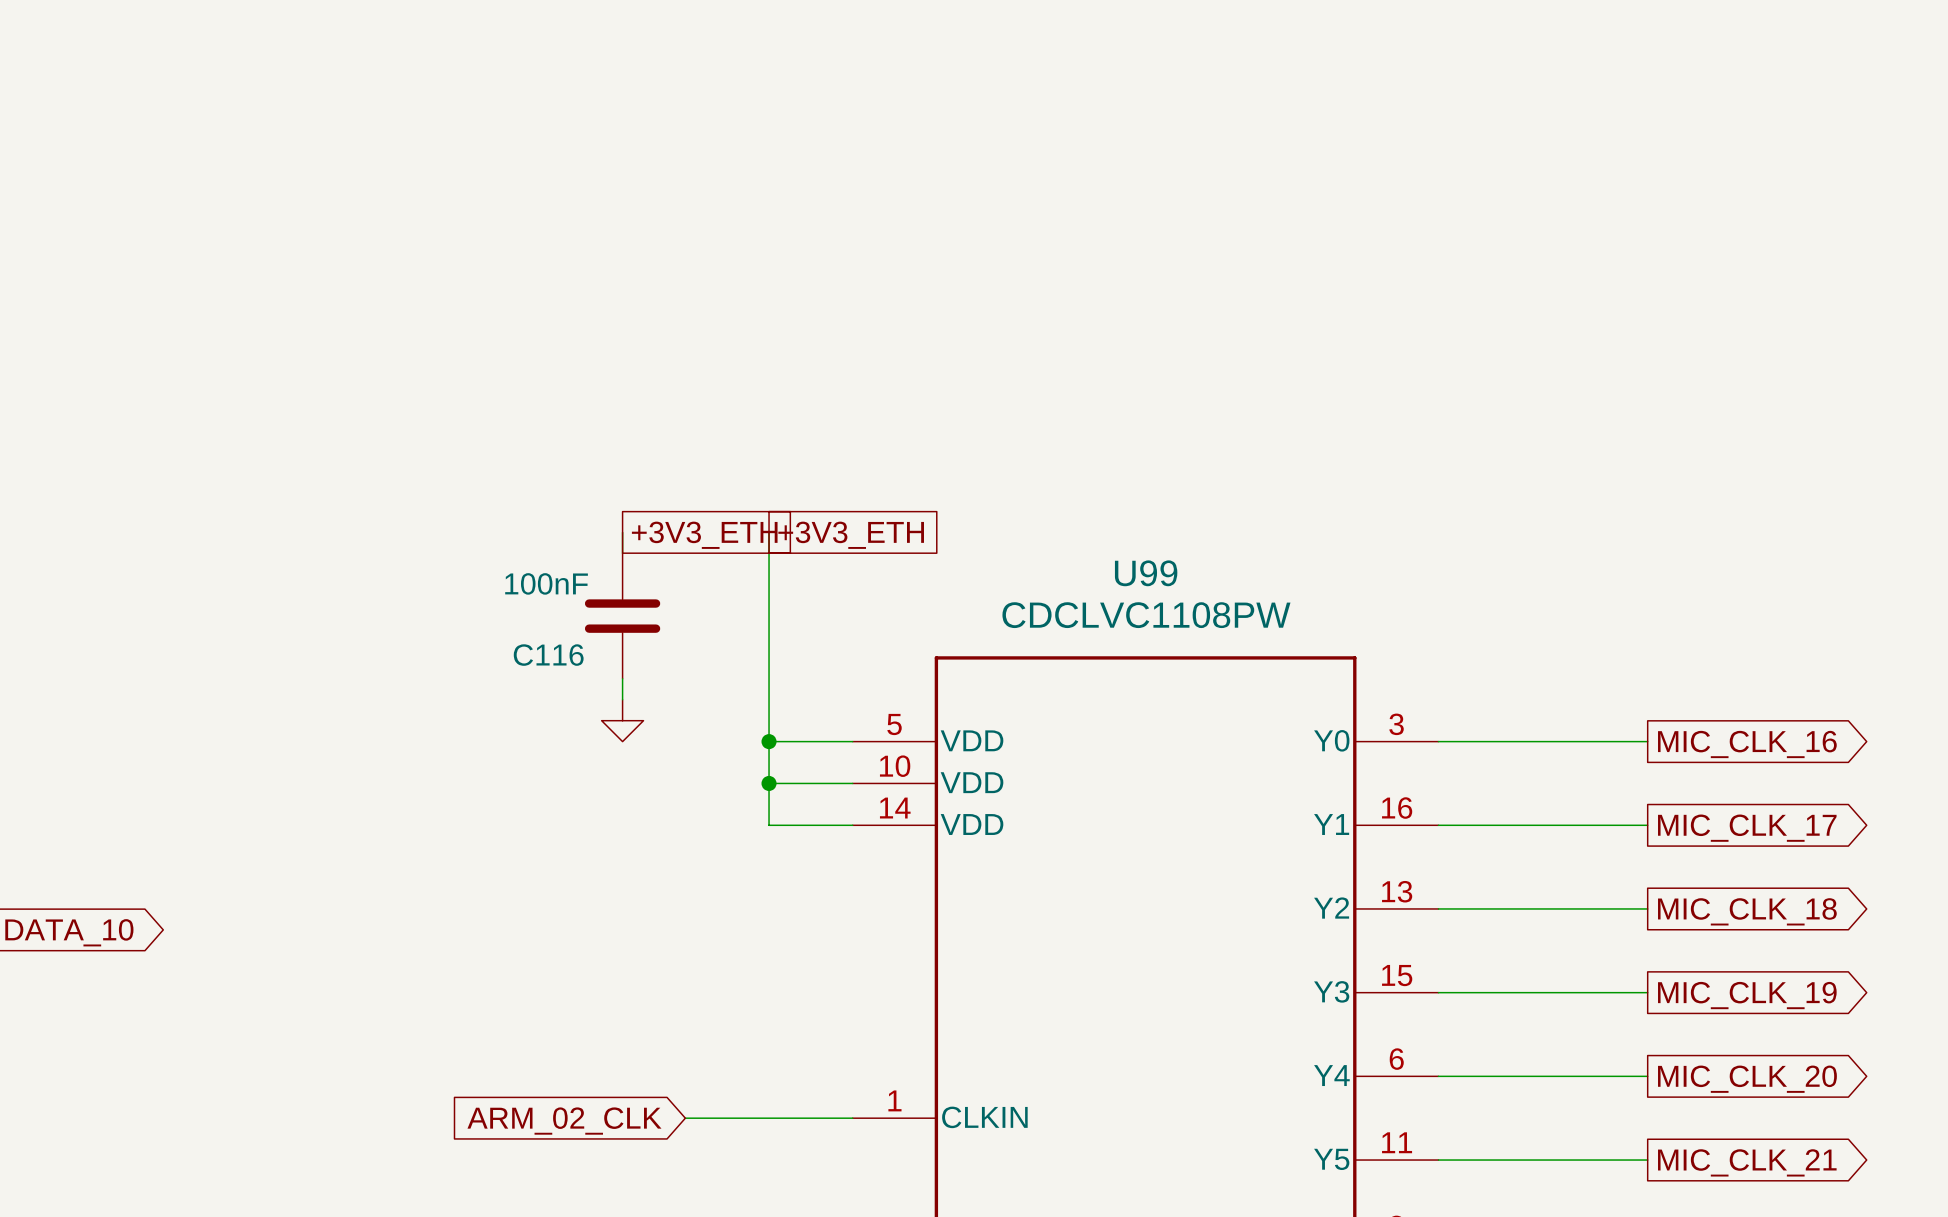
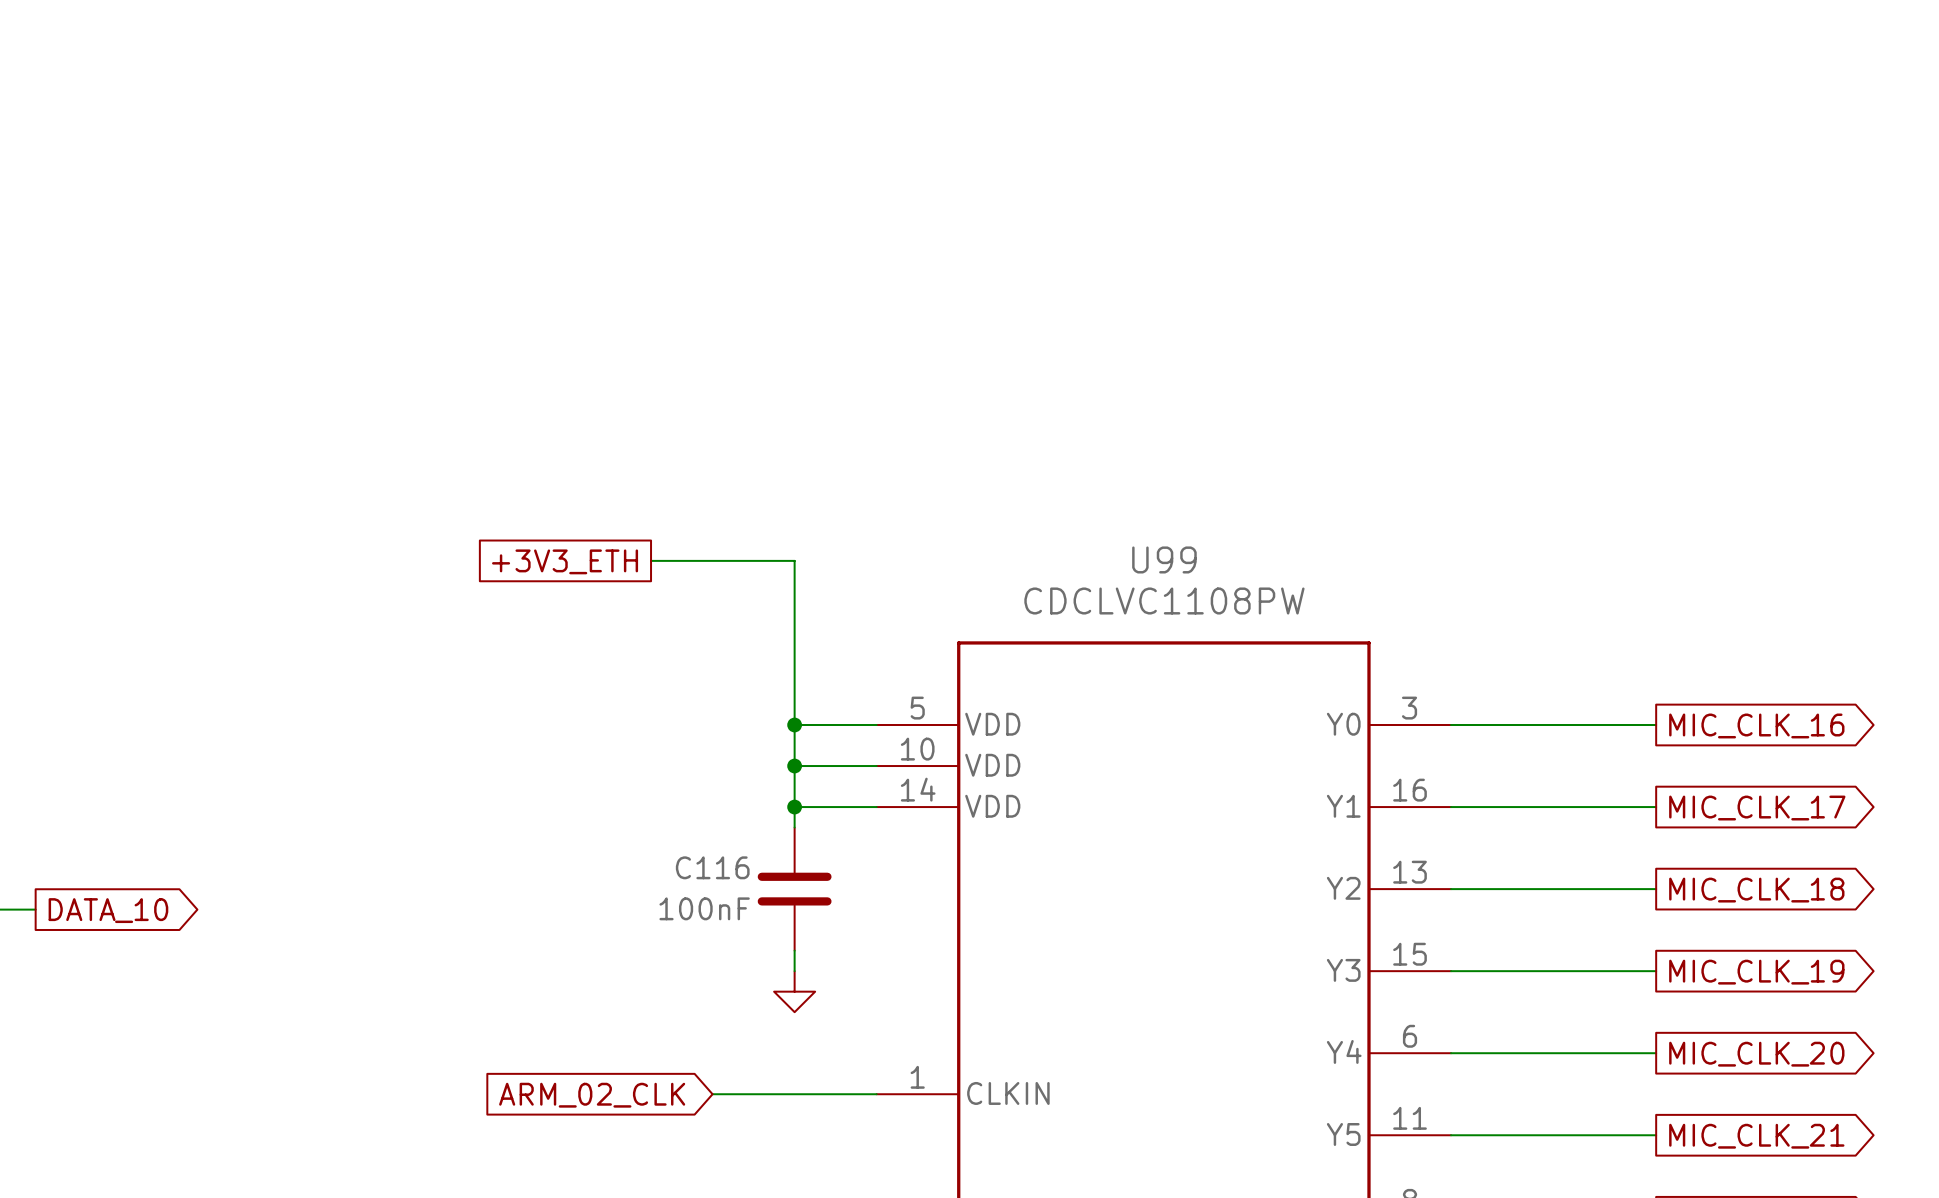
wire: (769, 532) (769, 574) -> (651, 560) (794, 560)
global label rotation: 0° (704, 535) -> 180° (565, 561)
global label position: +3V3_ETH (704, 535) -> +3V3_ETH (565, 561)
global label: +3V3_ETH (851, 535) -> none
C116 value position: 100nF (546, 583) -> 100nF (704, 908)
C116 position: (622, 616) -> (794, 889)
C116 name position: C116 (548, 655) -> C116 (712, 867)
wire: (622, 678) (622, 699) -> (794, 807) (794, 827)
power symbol position: (622, 720) -> (794, 991)
junction: none -> (794, 807)
wire: none -> (794, 950) (794, 971)

